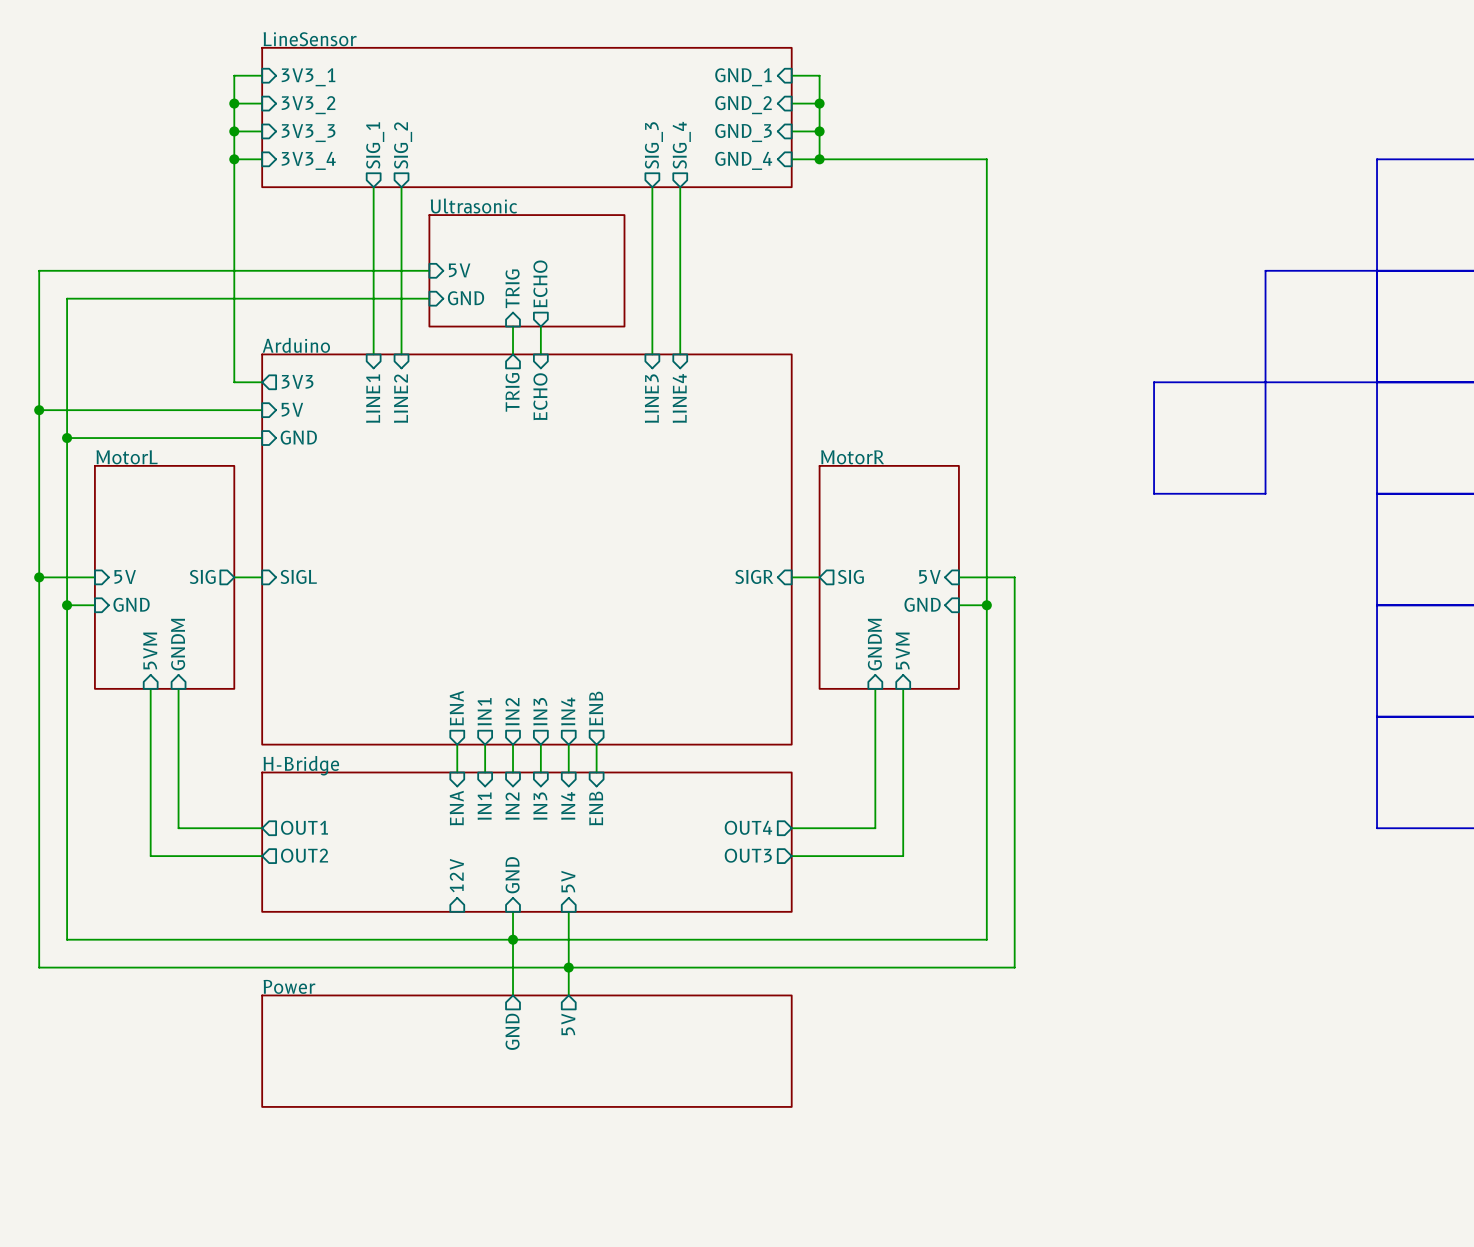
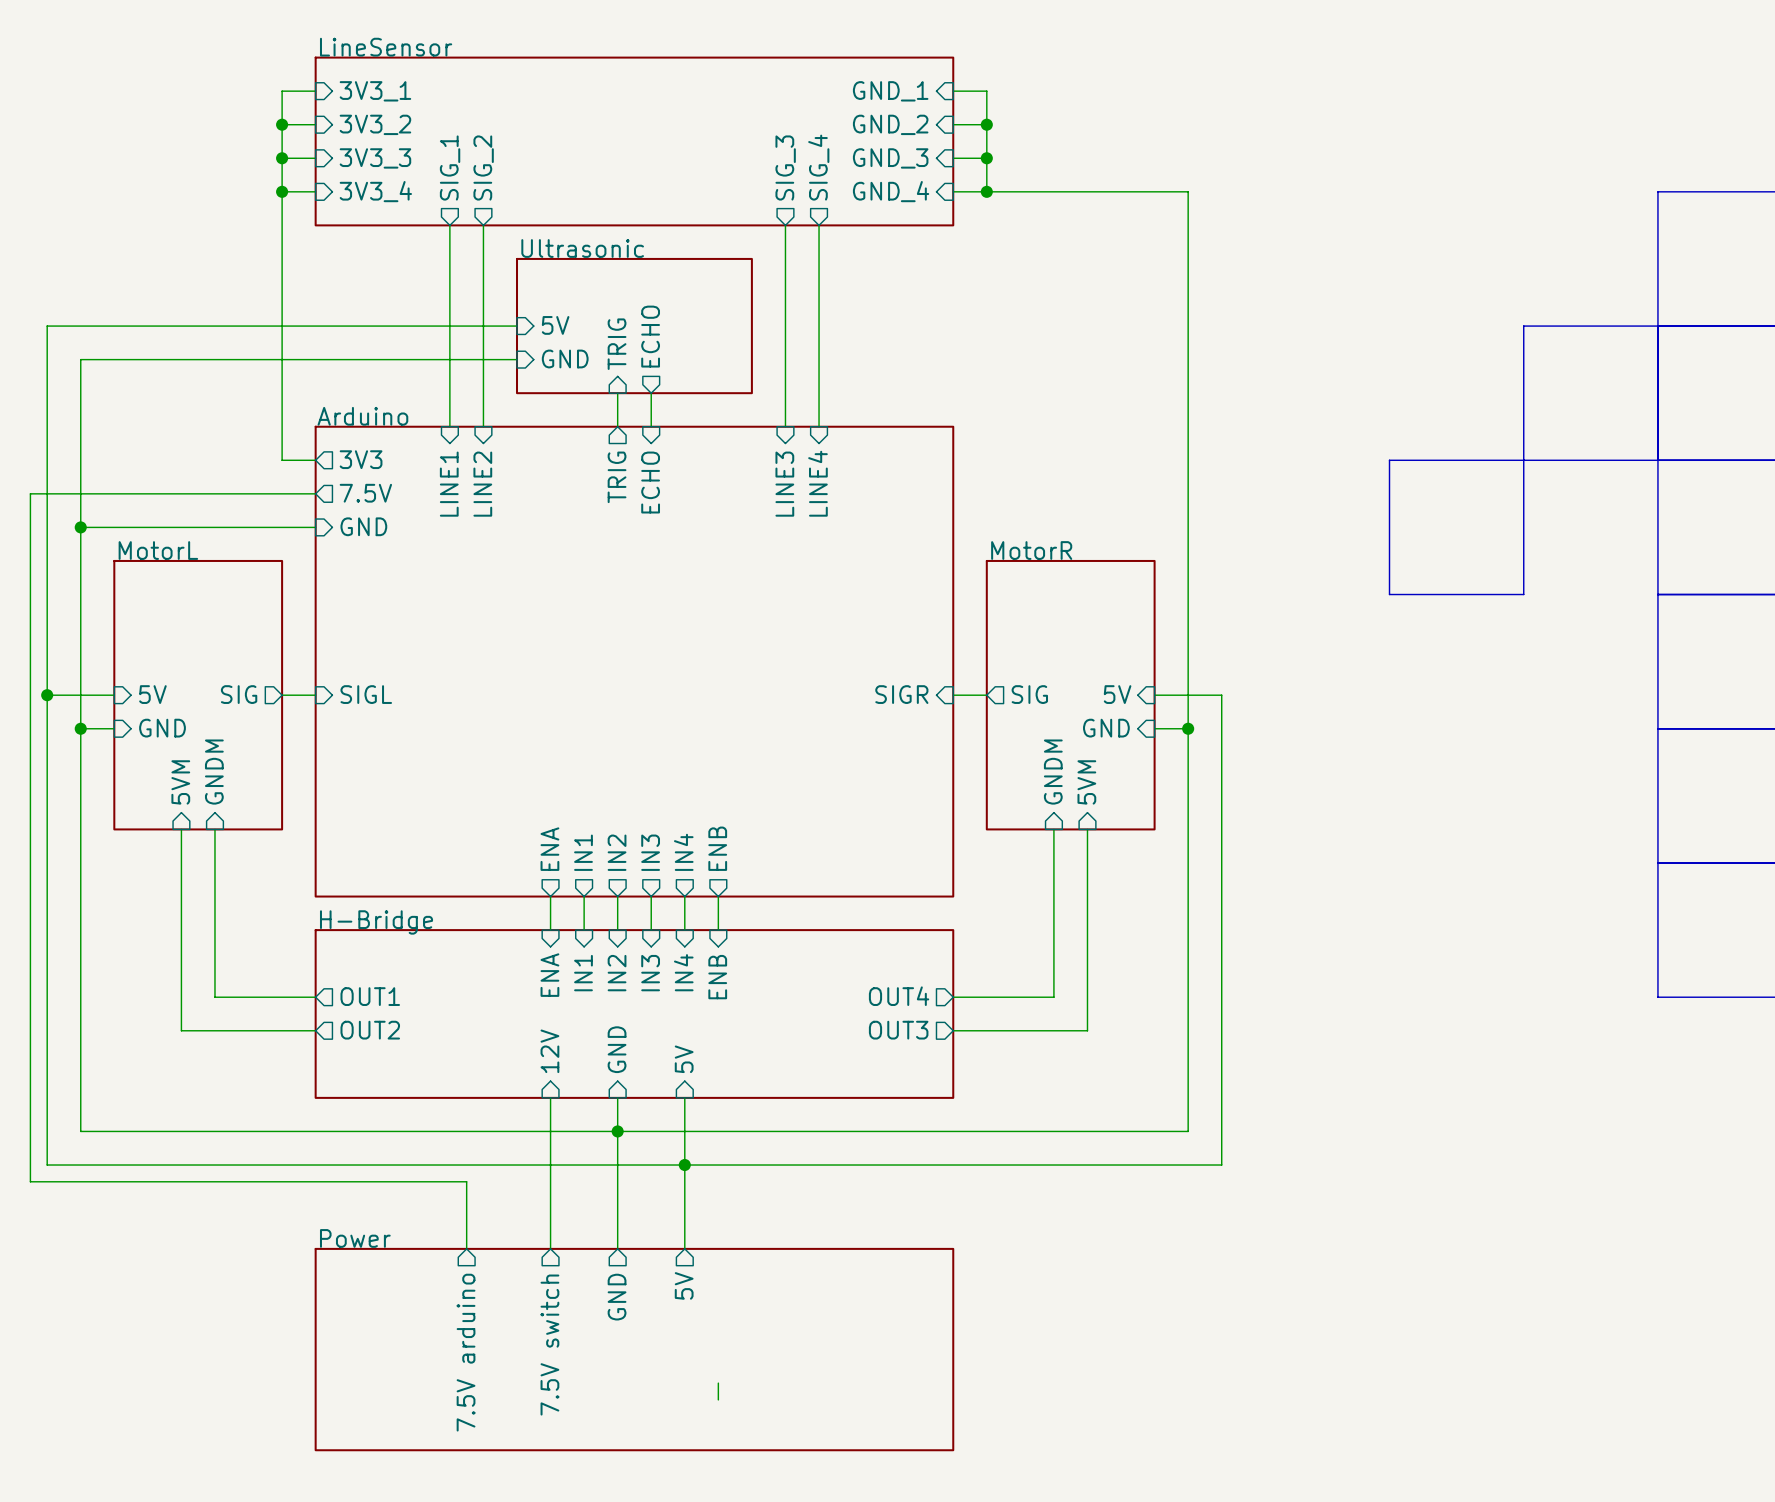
sheet pin shape: input (292, 409) -> output (365, 493)
sheet pin: 5V (292, 409) -> 7.5V (365, 493)
wire: none -> (47, 493) (30, 493) (30, 1181) (466, 1181) (466, 1248)
junction: (39, 410) -> none
wire: none -> (550, 1097) (550, 1248)
wire: none -> (617, 1198) (617, 1248)
wire: none -> (684, 1198) (684, 1248)
sheet pin position: 5V (568, 1024) -> 5V (684, 1285)
sheet pin position: GND (512, 1031) -> GND (617, 1297)
sheet Power: (526, 1051) -> none
sheet pin: none -> 7.5V switch (549, 1345)
sheet pin: none -> 7.5V arduino (466, 1352)
sheet Power: none -> (634, 1349)
wire: none -> (718, 1383) (718, 1399)

